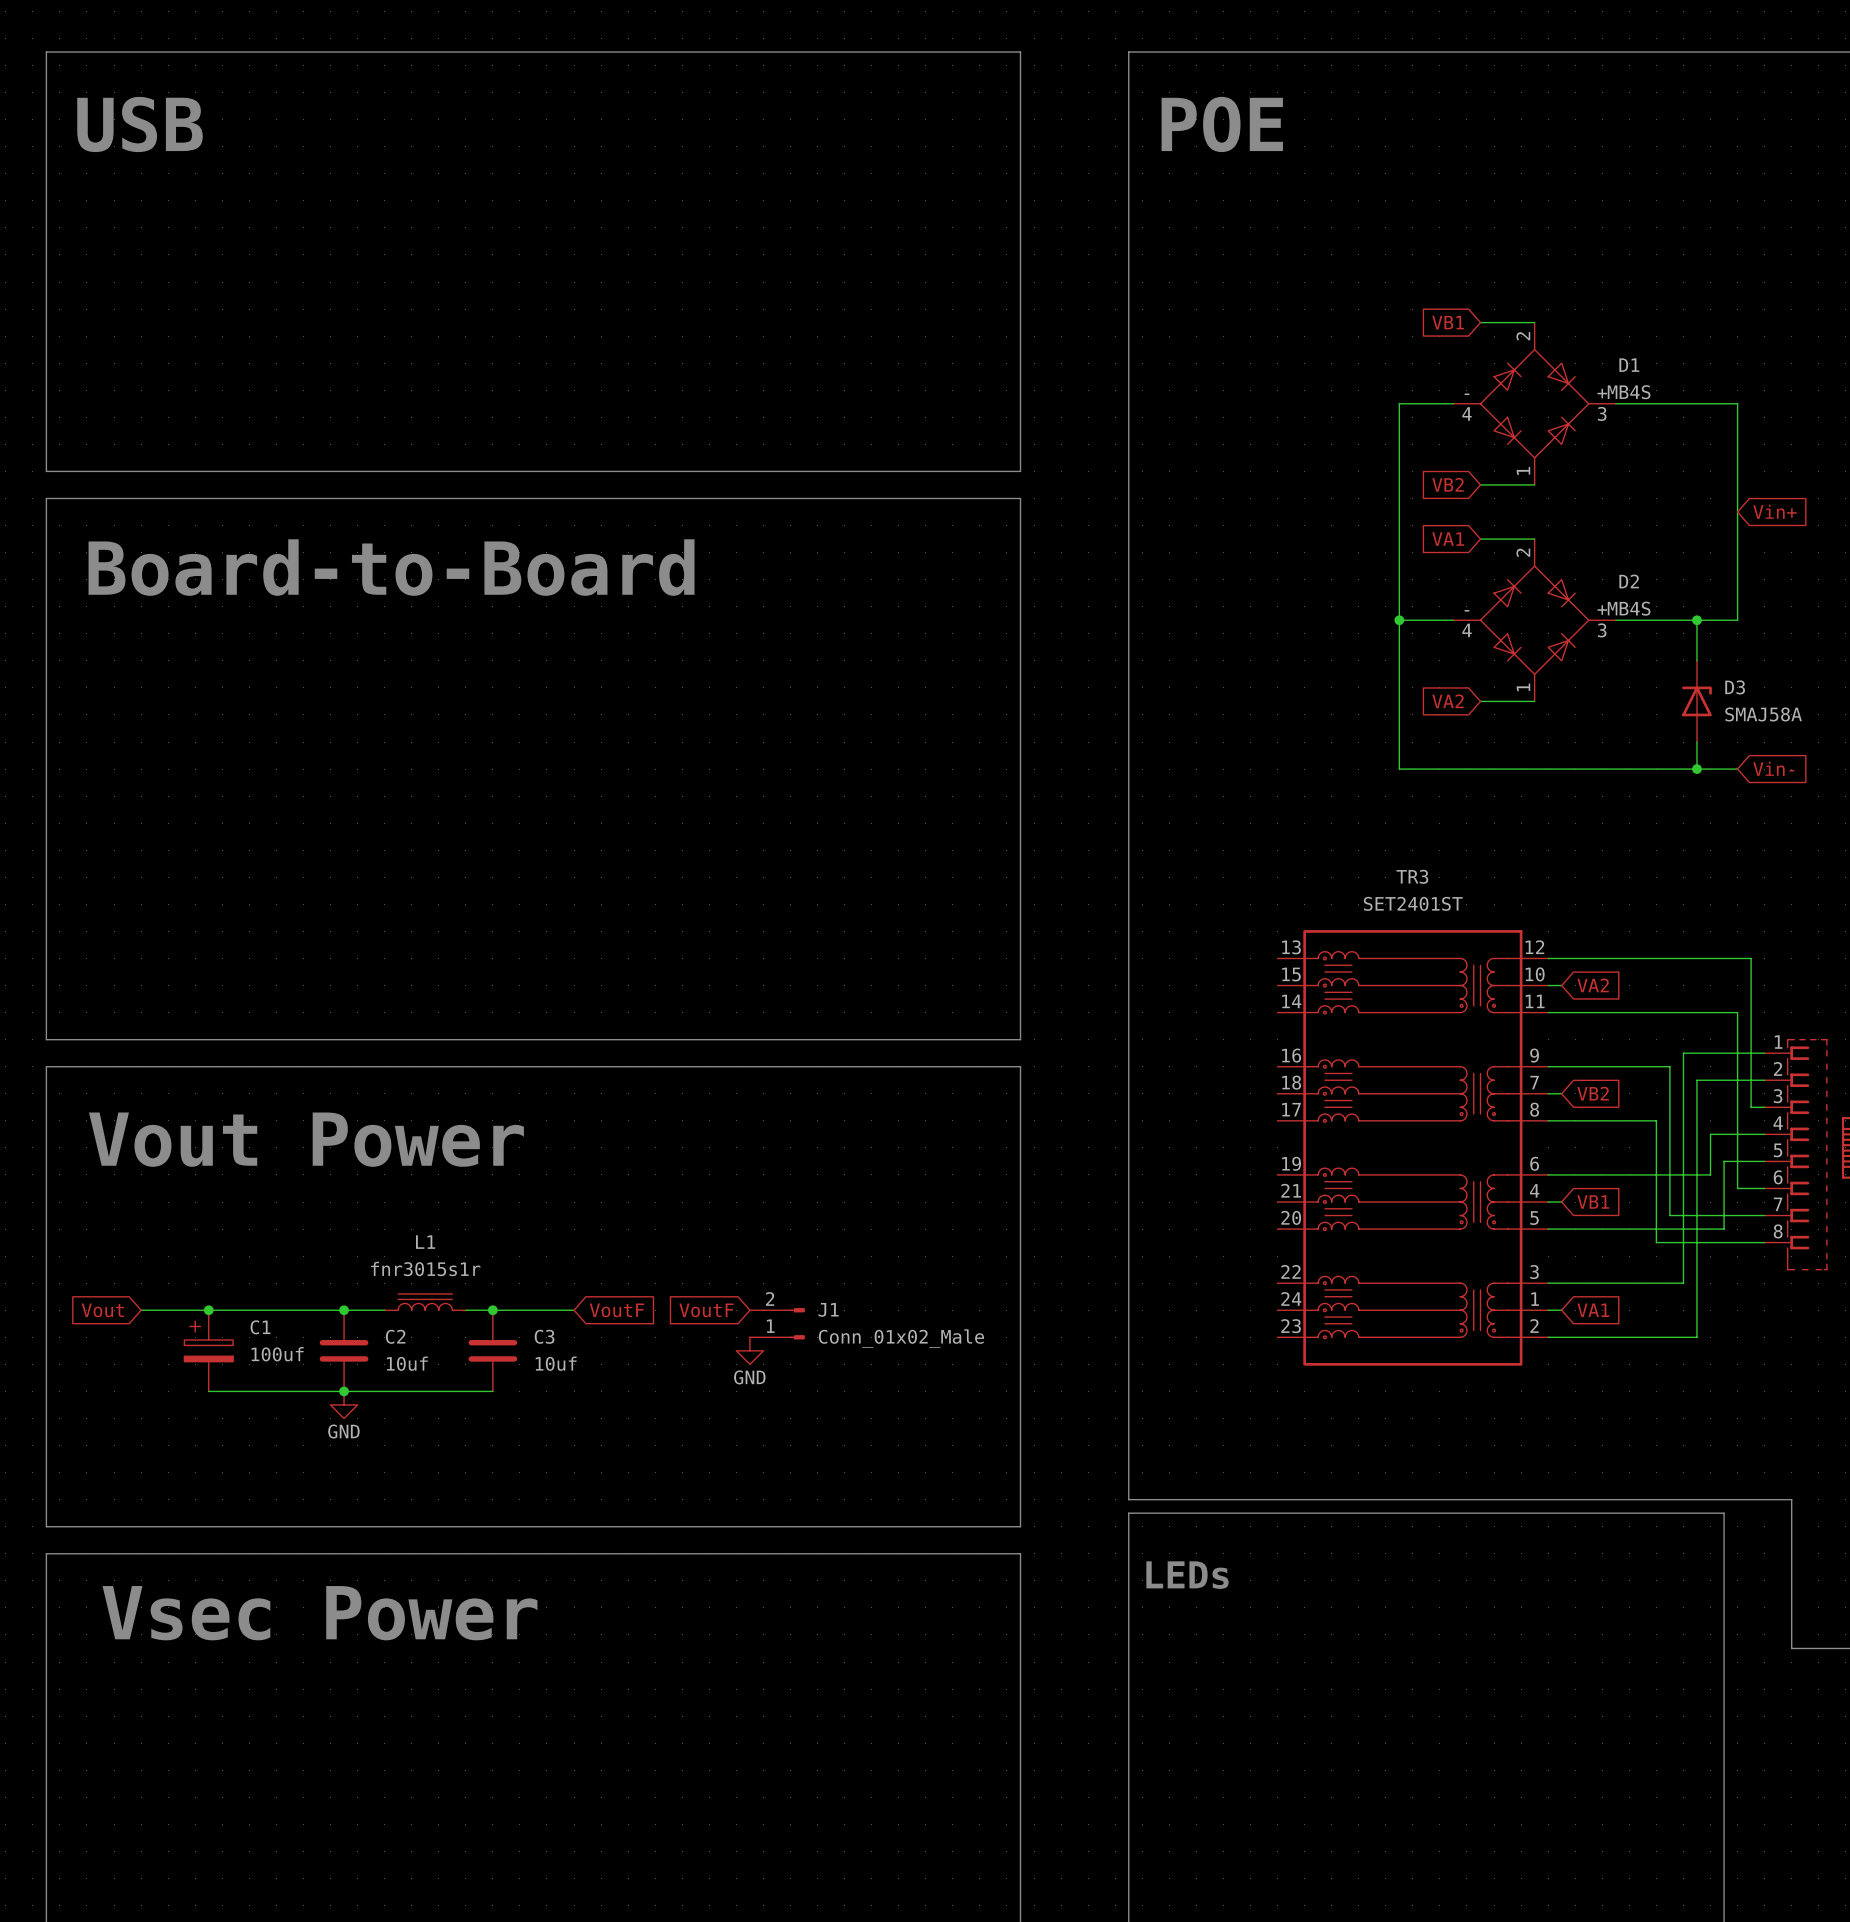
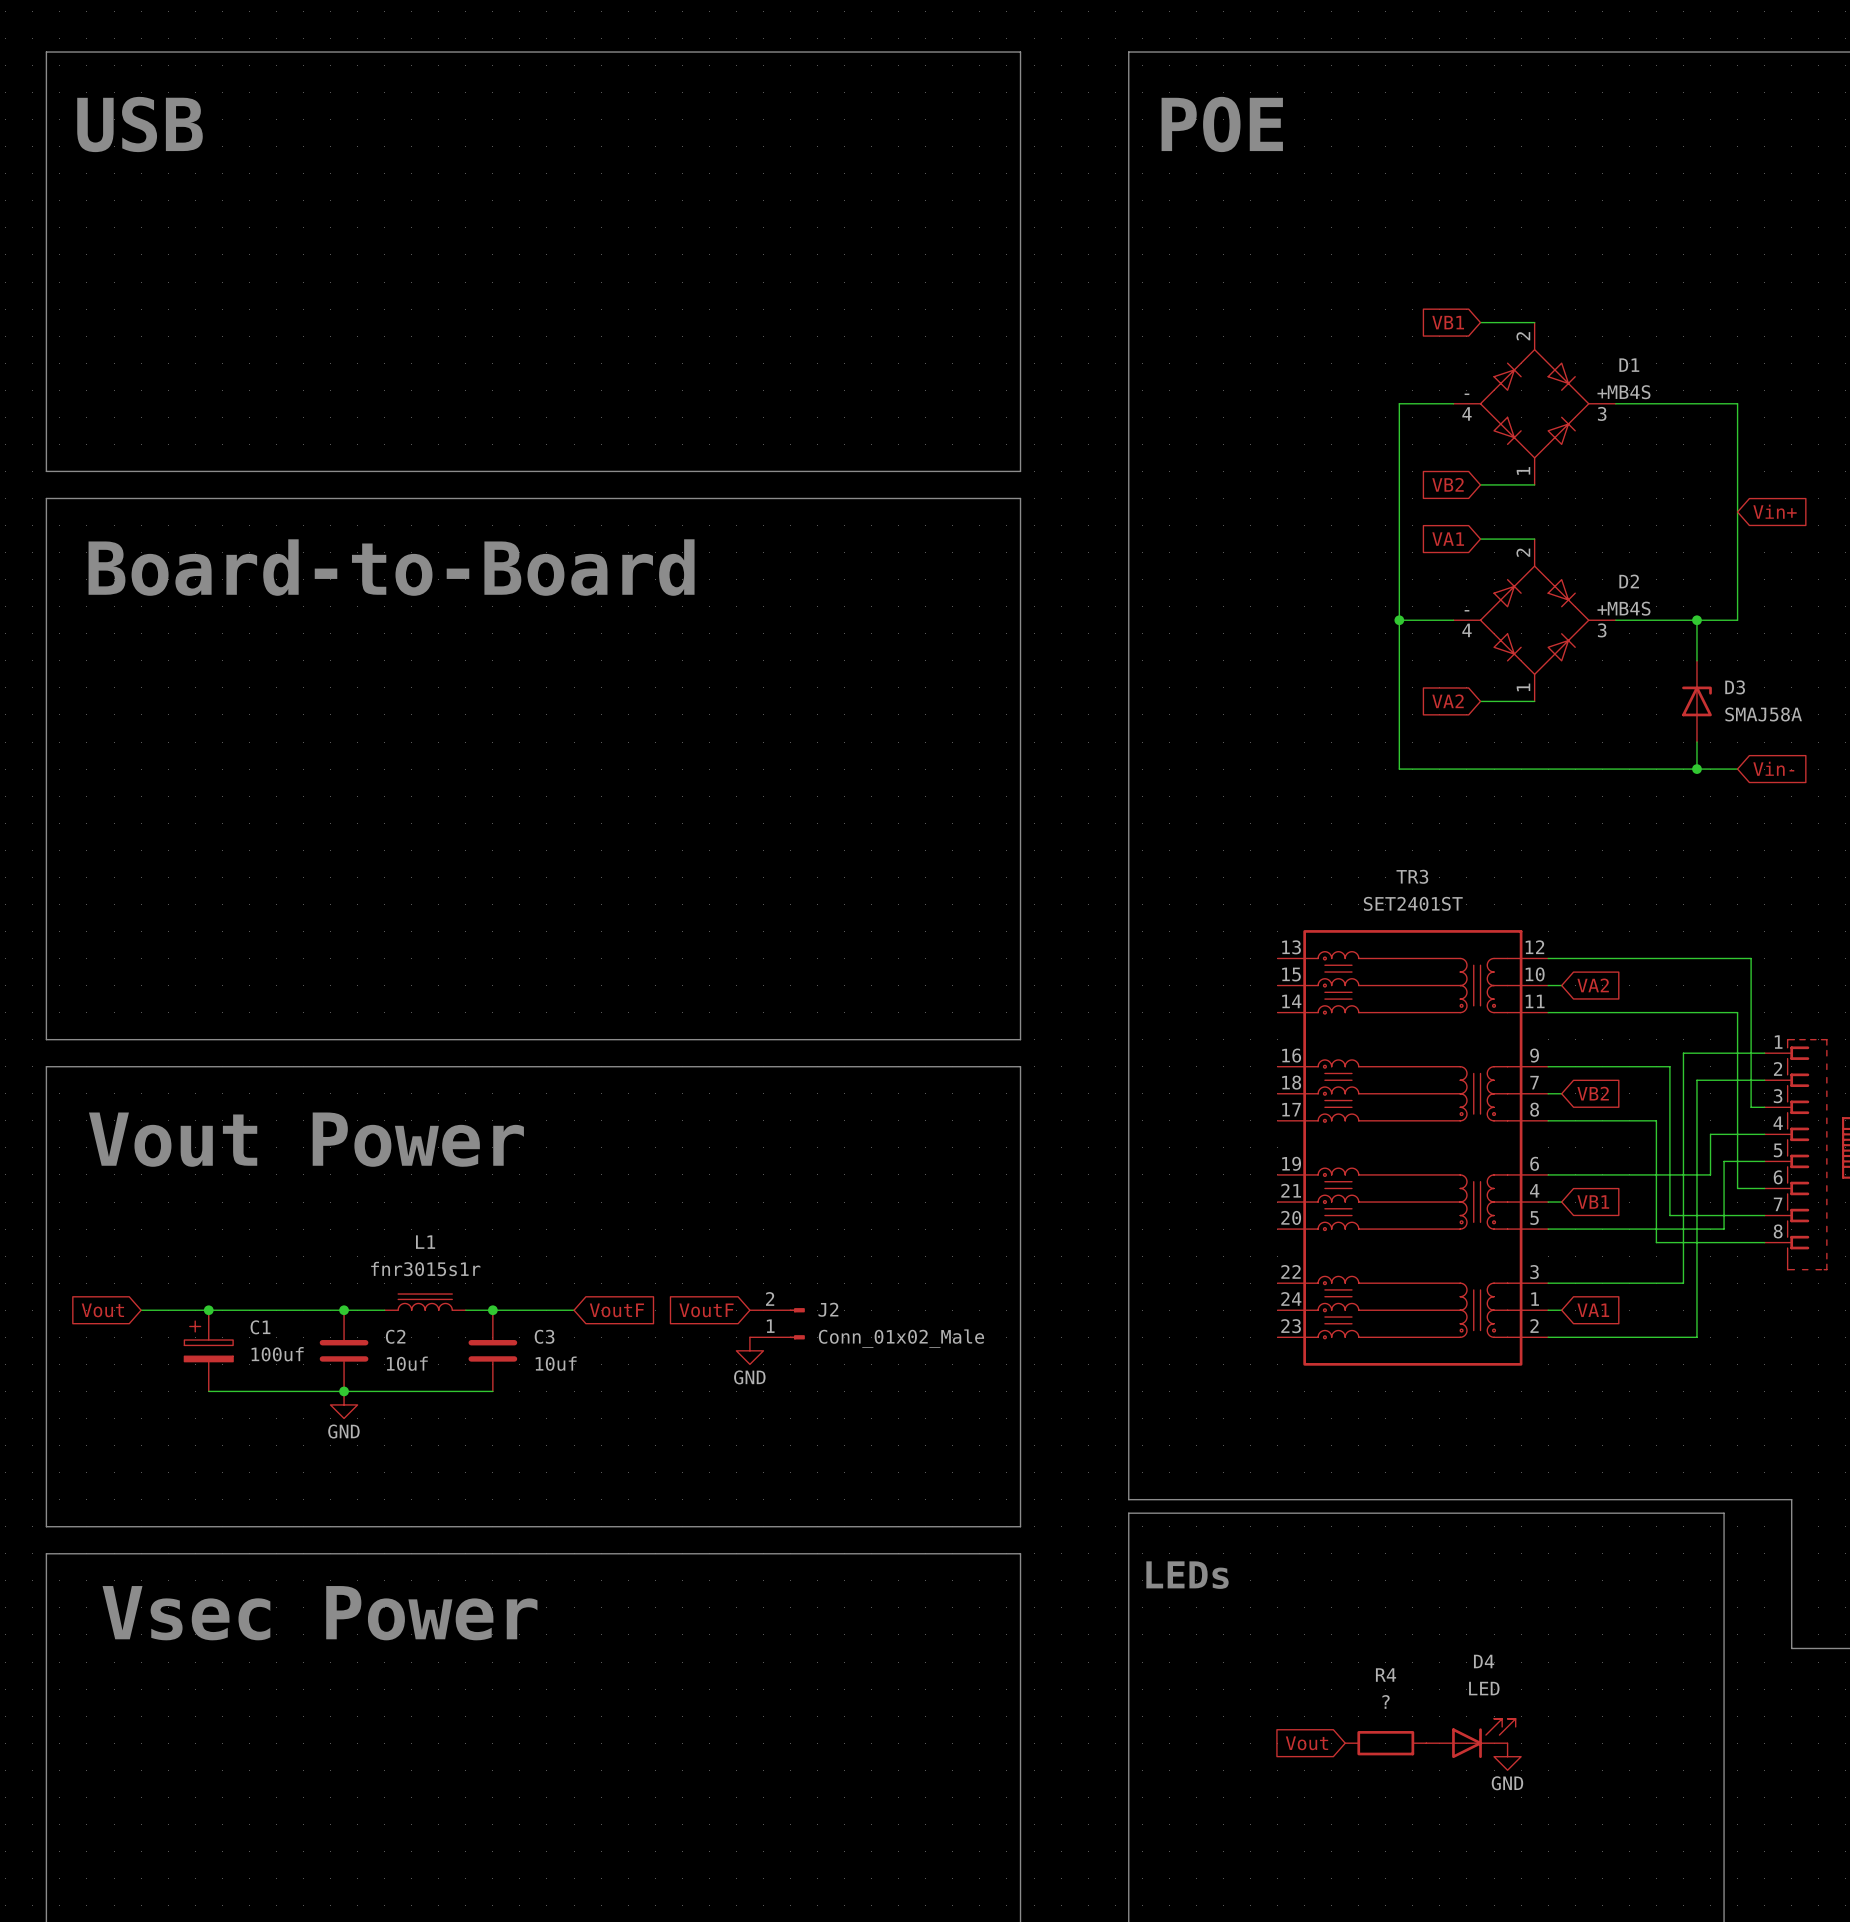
J1 name: J1 (828, 1309) -> J2 (828, 1309)
D4: none -> LED (1471, 1738)
global label: none -> Vout (1307, 1743)
R4: none -> ? (1385, 1743)
power symbol: none -> GND (1507, 1756)

